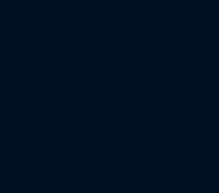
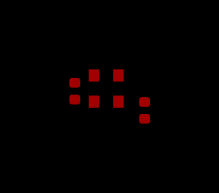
part: none -> (106, 75)
part: none -> (74, 91)
part: none -> (106, 101)
part: none -> (144, 110)

